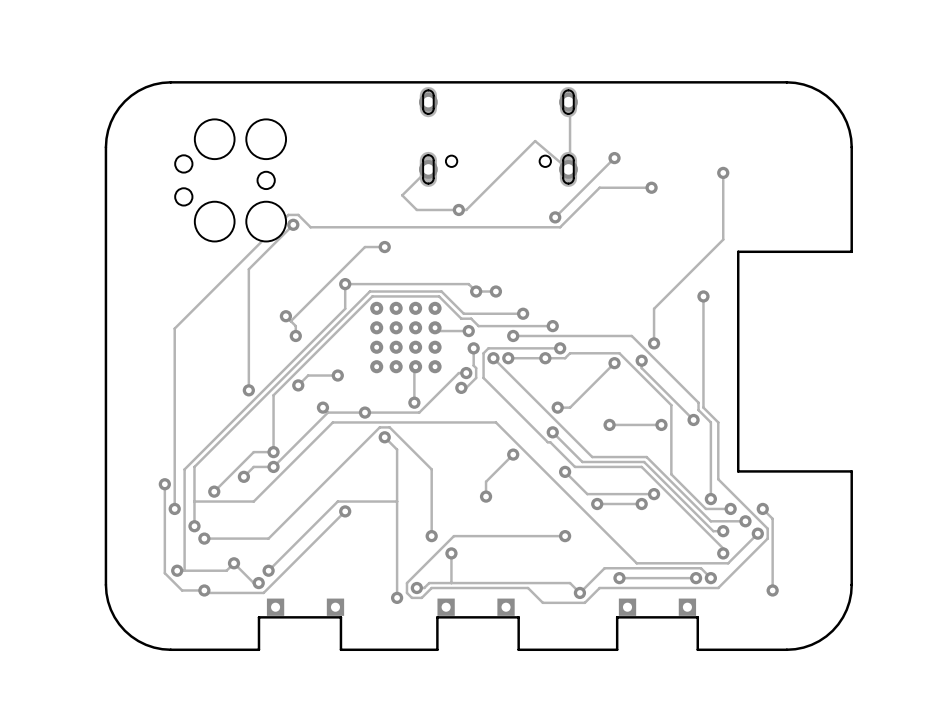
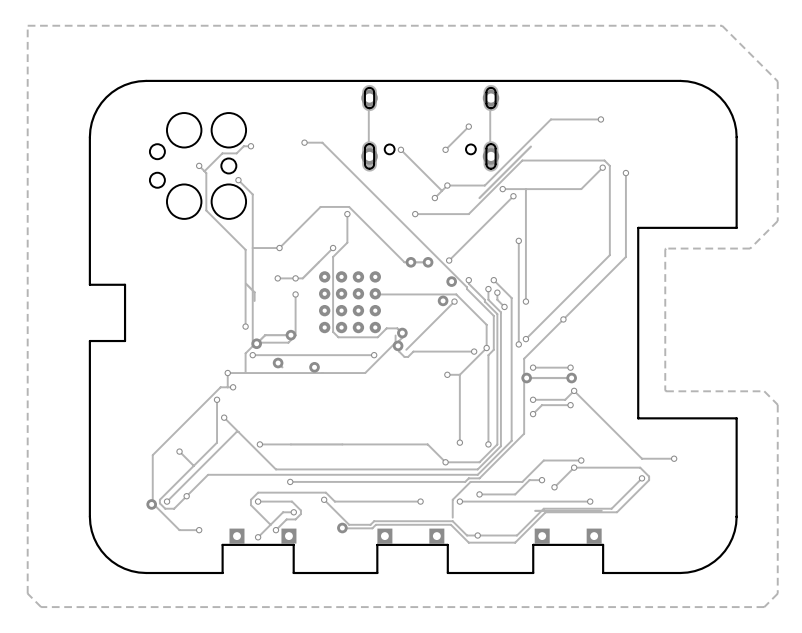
zone outline: none -> (722, 25) (27, 25) (27, 593) (41, 607) (764, 607) (777, 593) (777, 404) (764, 391) (665, 390) (665, 249) (750, 248) (777, 221) (777, 81) (722, 25)
track: none -> (369, 98) (369, 156)
track: (568, 102) (570, 103) (570, 167) (568, 169) (535, 141) (466, 209) (416, 209) (402, 195) (428, 169) -> (491, 98) (491, 156)
track: none -> (600, 119) (550, 119) (484, 185) (447, 185) (434, 198)
via: none -> (600, 119)
track: none -> (468, 126) (445, 149)
via: none -> (468, 126)
track: none -> (304, 142) (322, 142) (493, 315) (493, 349) (488, 355) (488, 444)
via: none -> (304, 142)
track: none -> (250, 146) (243, 146) (236, 153) (222, 153) (204, 171)
via: none -> (250, 146)
via: (614, 158) -> none
track: none -> (400, 149) (442, 190)
via: none -> (400, 149)
via: none -> (445, 149)
track: (723, 172) (723, 239) (654, 308) (654, 343) -> none
via: (723, 172) -> none
track: none -> (199, 165) (206, 173) (206, 210) (245, 249) (245, 326)
via: none -> (199, 165)
track: none -> (602, 167) (581, 189) (502, 189)
via: none -> (602, 167)
track: (651, 187) (599, 187) (560, 227) (310, 227) (298, 214) (288, 214) (174, 328) (174, 508) -> none
via: (651, 187) -> none
track: none -> (625, 173) (625, 256) (524, 358) (524, 433) (479, 478) (468, 478) (465, 481) (290, 481)
via: none -> (625, 173)
track: none -> (238, 180) (252, 194) (252, 346) (245, 353) (245, 373)
via: none -> (238, 180)
via: none -> (447, 185)
via: none -> (502, 189)
track: none -> (525, 189) (525, 301)
via: (458, 209) -> none
track: none -> (513, 196) (449, 260)
via: none -> (513, 196)
via: none -> (434, 198)
via: (555, 217) -> none
track: (293, 224) (248, 269) (248, 390) -> none
via: (293, 224) -> none
track: none -> (347, 214) (347, 242) (333, 256) (333, 331) (338, 337) (377, 337) (386, 328) (397, 328) (402, 333) (402, 337) (399, 340) (399, 351) (404, 356) (408, 356) (413, 351) (474, 351)
via: none -> (347, 214)
track: none -> (415, 214) (468, 214) (522, 160) (604, 160) (609, 165) (609, 255) (525, 339)
via: none -> (415, 214)
track: (384, 247) (364, 247) (290, 321) -> none
via: (384, 247) -> none
track: none -> (518, 240) (518, 344)
via: none -> (518, 240)
via: none -> (279, 248)
via: none -> (333, 248)
via: (345, 284) -> none
via: none -> (449, 260)
track: (369, 291) (441, 291) (463, 313) (523, 313) -> (318, 262) (333, 248)
track: (476, 291) (468, 284) (345, 284) (345, 308) (184, 469) (184, 570) -> (410, 262) (404, 262) (349, 206) (320, 206) (279, 248) (252, 248)
track: (703, 296) (703, 407) (718, 422) (718, 479) (767, 528) (767, 538) (718, 588) (599, 588) (584, 602) (542, 602) (528, 588) (431, 588) (421, 597) (411, 597) (406, 592) (406, 583) (453, 536) (565, 536) -> none
via: (703, 296) -> none
via: none -> (277, 278)
via: none -> (295, 278)
track: (351, 310) (194, 466) (194, 526) -> (302, 278) (277, 278)
track: none -> (468, 280) (468, 283) (497, 314) (497, 444) (479, 462) (445, 462) (427, 444) (342, 444)
via: none -> (468, 280)
track: none -> (493, 280) (511, 298) (511, 440) (477, 474) (208, 474) (174, 508) (165, 508) (159, 503) (159, 499) (217, 442) (217, 399)
via: none -> (493, 280)
via: (285, 316) -> none
board edge: (105, 317) (105, 382) -> (89, 284) (125, 284) (125, 341) (89, 341)
track: none -> (488, 289) (488, 299) (500, 312) (500, 446) (477, 469) (275, 469) (224, 417)
via: none -> (488, 289)
track: (552, 326) (478, 326) (471, 318) (461, 318) (439, 296) (372, 296) (273, 395) (273, 452) (253, 452) (214, 491) -> none
via: (552, 326) -> none
track: none -> (497, 292) (497, 299) (504, 306)
via: none -> (497, 292)
track: (435, 327) (439, 331) (468, 331) -> (375, 293) (456, 294) (486, 324) (486, 348) (459, 374)
track: none -> (295, 294) (295, 335) (288, 342) (259, 342)
via: none -> (295, 294)
via: (468, 331) -> none
via: (295, 335) -> none
track: (513, 335) (631, 335) (698, 402) (698, 410) (710, 422) (710, 499) -> none
track: none -> (454, 301) (406, 349)
via: none -> (454, 301)
via: none -> (525, 301)
via: none -> (504, 306)
via: (654, 343) -> none
track: (473, 348) (476, 377) (466, 387) (461, 387) -> none
via: (473, 348) -> none
track: (560, 348) (488, 348) (483, 353) (483, 377) (574, 466) (641, 466) (723, 548) (723, 553) -> none
via: (560, 348) -> none
via: none -> (563, 319)
track: (493, 358) (592, 457) (646, 457) (710, 521) (745, 521) -> none
via: (493, 358) -> none
track: (508, 358) (565, 358) (570, 353) (619, 353) (671, 405) (671, 474) (705, 508) (730, 508) -> none
via: (508, 358) -> none
via: (545, 358) -> none
track: (641, 360) (641, 368) (693, 419) -> none
via: (641, 360) -> none
track: (614, 363) (570, 407) (557, 407) -> none
via: (614, 363) -> none
via: none -> (245, 326)
track: (415, 366) (414, 402) -> none
track: (466, 373) (458, 373) (419, 412) (327, 412) (273, 466) (253, 466) (243, 476) -> none
track: none -> (395, 335) (395, 342) (365, 373) (227, 373) (227, 387)
via: none -> (525, 339)
via: none -> (518, 344)
via: (248, 390) -> none
via: none -> (486, 348)
via: none -> (474, 351)
via: none -> (252, 355)
track: none -> (374, 355) (252, 355)
via: none -> (374, 355)
via: (414, 402) -> none
via: (557, 407) -> none
via: none -> (533, 367)
track: none -> (570, 367) (533, 367)
via: none -> (570, 367)
via: none -> (227, 373)
via: (693, 419) -> none
via: none -> (447, 374)
track: none -> (459, 374) (459, 442)
track: none -> (459, 374) (447, 374)
track: (552, 432) (582, 462) (644, 462) (713, 531) (723, 531) -> none
via: (552, 432) -> none
track: none -> (233, 387) (220, 387) (152, 455) (152, 503) (179, 530) (199, 530)
via: none -> (233, 387)
track: (384, 437) (397, 449) (397, 597) -> none
via: (384, 437) -> none
via: none -> (574, 390)
via: none -> (217, 399)
track: none -> (533, 399) (565, 399) (574, 390) (642, 458) (674, 458)
via: none -> (533, 399)
via: (273, 452) -> none
track: (513, 454) (486, 481) (486, 496) -> none
via: (513, 454) -> none
track: none -> (570, 405) (542, 405) (533, 414)
via: none -> (570, 405)
via: (273, 466) -> none
via: none -> (533, 414)
via: none -> (224, 417)
track: (565, 471) (587, 494) (654, 494) -> none
via: (565, 471) -> none
via: (243, 476) -> none
track: (164, 484) (164, 573) (182, 590) (204, 590) (206, 592) (263, 592) (345, 511) -> none
via: (164, 484) -> none
track: none -> (238, 431) (167, 501)
via: (214, 491) -> none
via: (654, 494) -> none
via: (486, 496) -> none
via: none -> (459, 442)
via: (710, 499) -> none
track: (194, 501) (253, 501) (332, 422) (495, 422) (636, 563) (728, 563) (757, 533) -> none
via: none -> (259, 444)
track: (337, 501) (268, 570) -> (290, 444) (259, 444)
via: none -> (488, 444)
via: (597, 504) -> none
track: (641, 504) (597, 504) -> none
via: (641, 504) -> none
via: (174, 508) -> none
via: (730, 508) -> none
track: (762, 508) (772, 518) (772, 590) -> none
via: (762, 508) -> none
track: none -> (179, 451) (193, 465)
via: none -> (179, 451)
via: (345, 511) -> none
via: none -> (674, 458)
track: none -> (581, 460) (543, 460) (522, 481) (470, 481) (452, 499) (452, 517)
via: none -> (581, 460)
via: (745, 521) -> none
via: none -> (445, 462)
via: (194, 526) -> none
via: none -> (574, 467)
via: (723, 531) -> none
via: (757, 533) -> none
track: (431, 536) (431, 469) (389, 427) (379, 427) (268, 538) (204, 538) -> none
via: (431, 536) -> none
via: (565, 536) -> none
via: (204, 538) -> none
track: none -> (642, 478) (611, 508) (543, 508) (517, 535) (467, 535) (452, 521) (374, 521) (370, 524) (349, 524) (324, 499)
via: none -> (642, 478)
track: none -> (542, 480) (529, 480) (515, 494) (479, 494)
via: none -> (542, 480)
via: none -> (290, 481)
track: none -> (554, 487) (574, 467) (640, 467) (649, 476) (649, 480) (617, 512) (545, 512) (515, 542) (468, 542) (450, 524) (375, 524) (372, 528) (343, 528)
via: none -> (554, 487)
track: (451, 553) (451, 583) -> none
via: (451, 553) -> none
via: (723, 553) -> none
via: none -> (479, 494)
via: none -> (186, 496)
via: (234, 563) -> none
via: none -> (324, 499)
via: none -> (167, 501)
track: none -> (258, 501) (292, 501) (300, 510) (300, 514) (295, 519) (286, 519) (275, 530)
via: none -> (258, 501)
track: none -> (420, 501) (334, 501) (325, 492) (258, 492) (250, 499) (250, 505) (270, 524)
via: none -> (420, 501)
via: none -> (459, 501)
track: none -> (590, 501) (459, 501)
via: none -> (590, 501)
track: (177, 570) (226, 570) (234, 563) (253, 583) (258, 583) -> none
via: (268, 570) -> none
via: (619, 578) -> none
via: (696, 578) -> none
track: (710, 578) (701, 568) (604, 568) (579, 592) (570, 583) (429, 583) (424, 588) (416, 588) -> none
via: (710, 578) -> none
track: none -> (293, 512) (283, 512) (258, 537)
via: none -> (293, 512)
via: (258, 583) -> none
via: (416, 588) -> none
via: (204, 590) -> none
via: (772, 590) -> none
via: (579, 592) -> none
via: none -> (199, 530)
via: none -> (275, 530)
via: none -> (477, 535)
via: none -> (258, 537)

